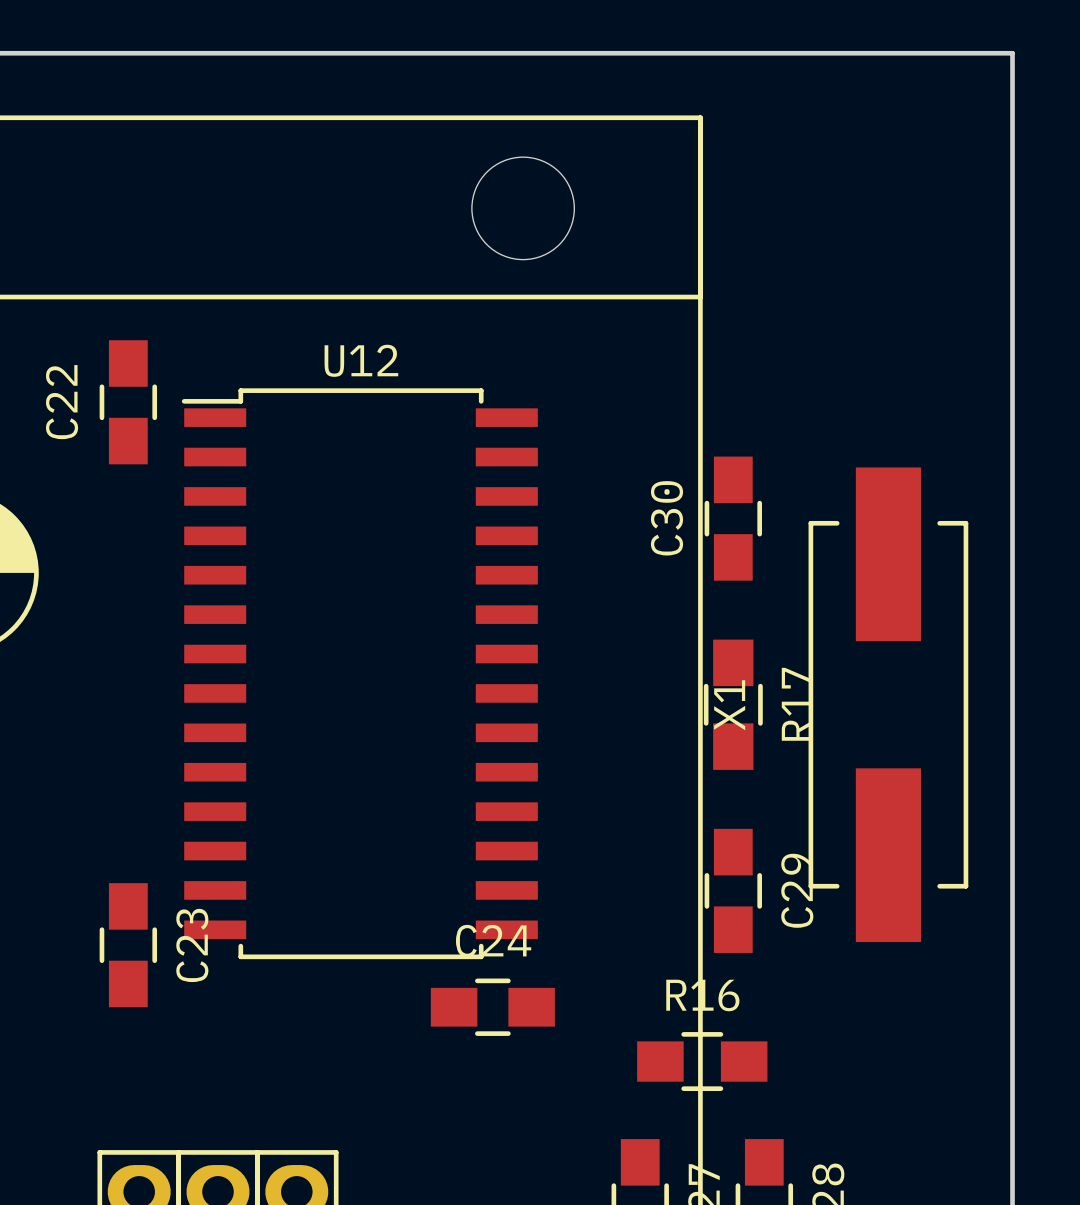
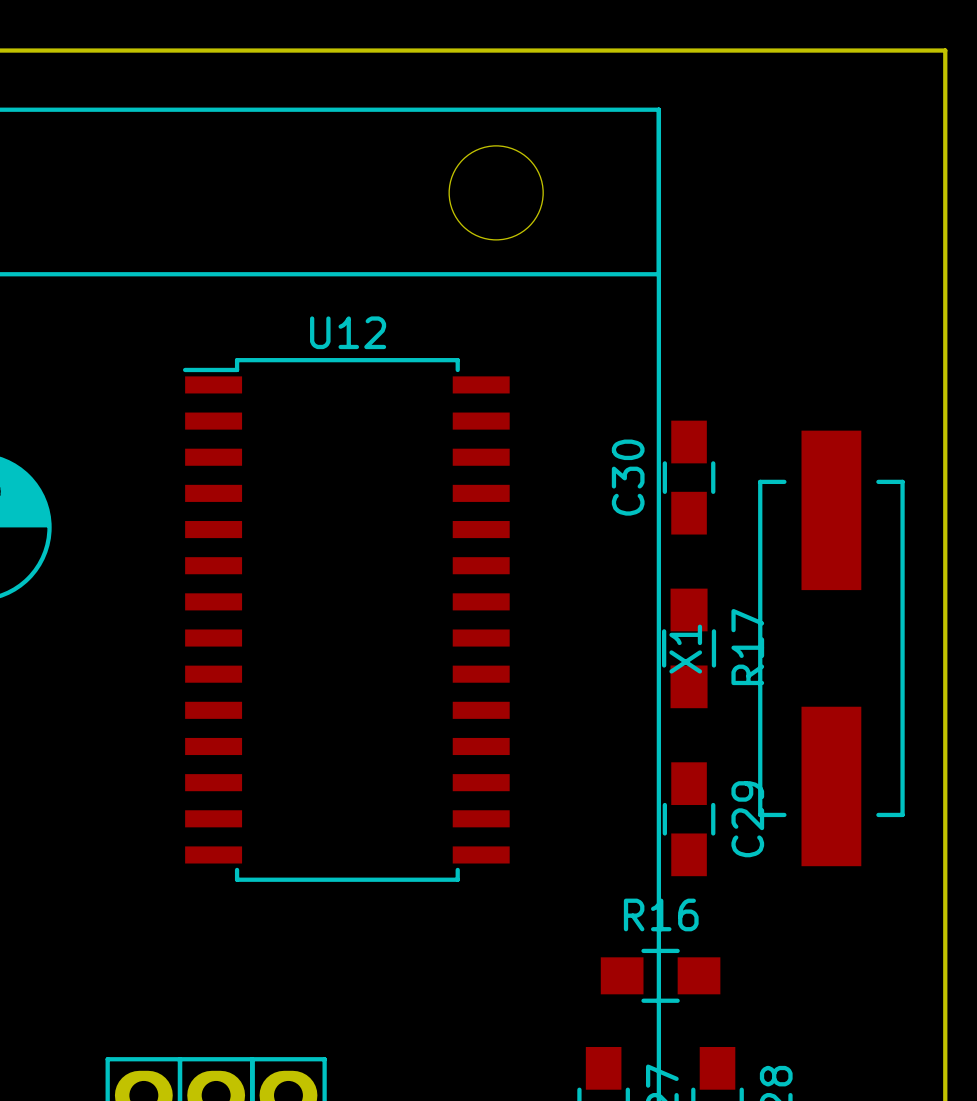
C22: (128, 402) -> none
C23: (128, 945) -> none
C24: (492, 1007) -> none

